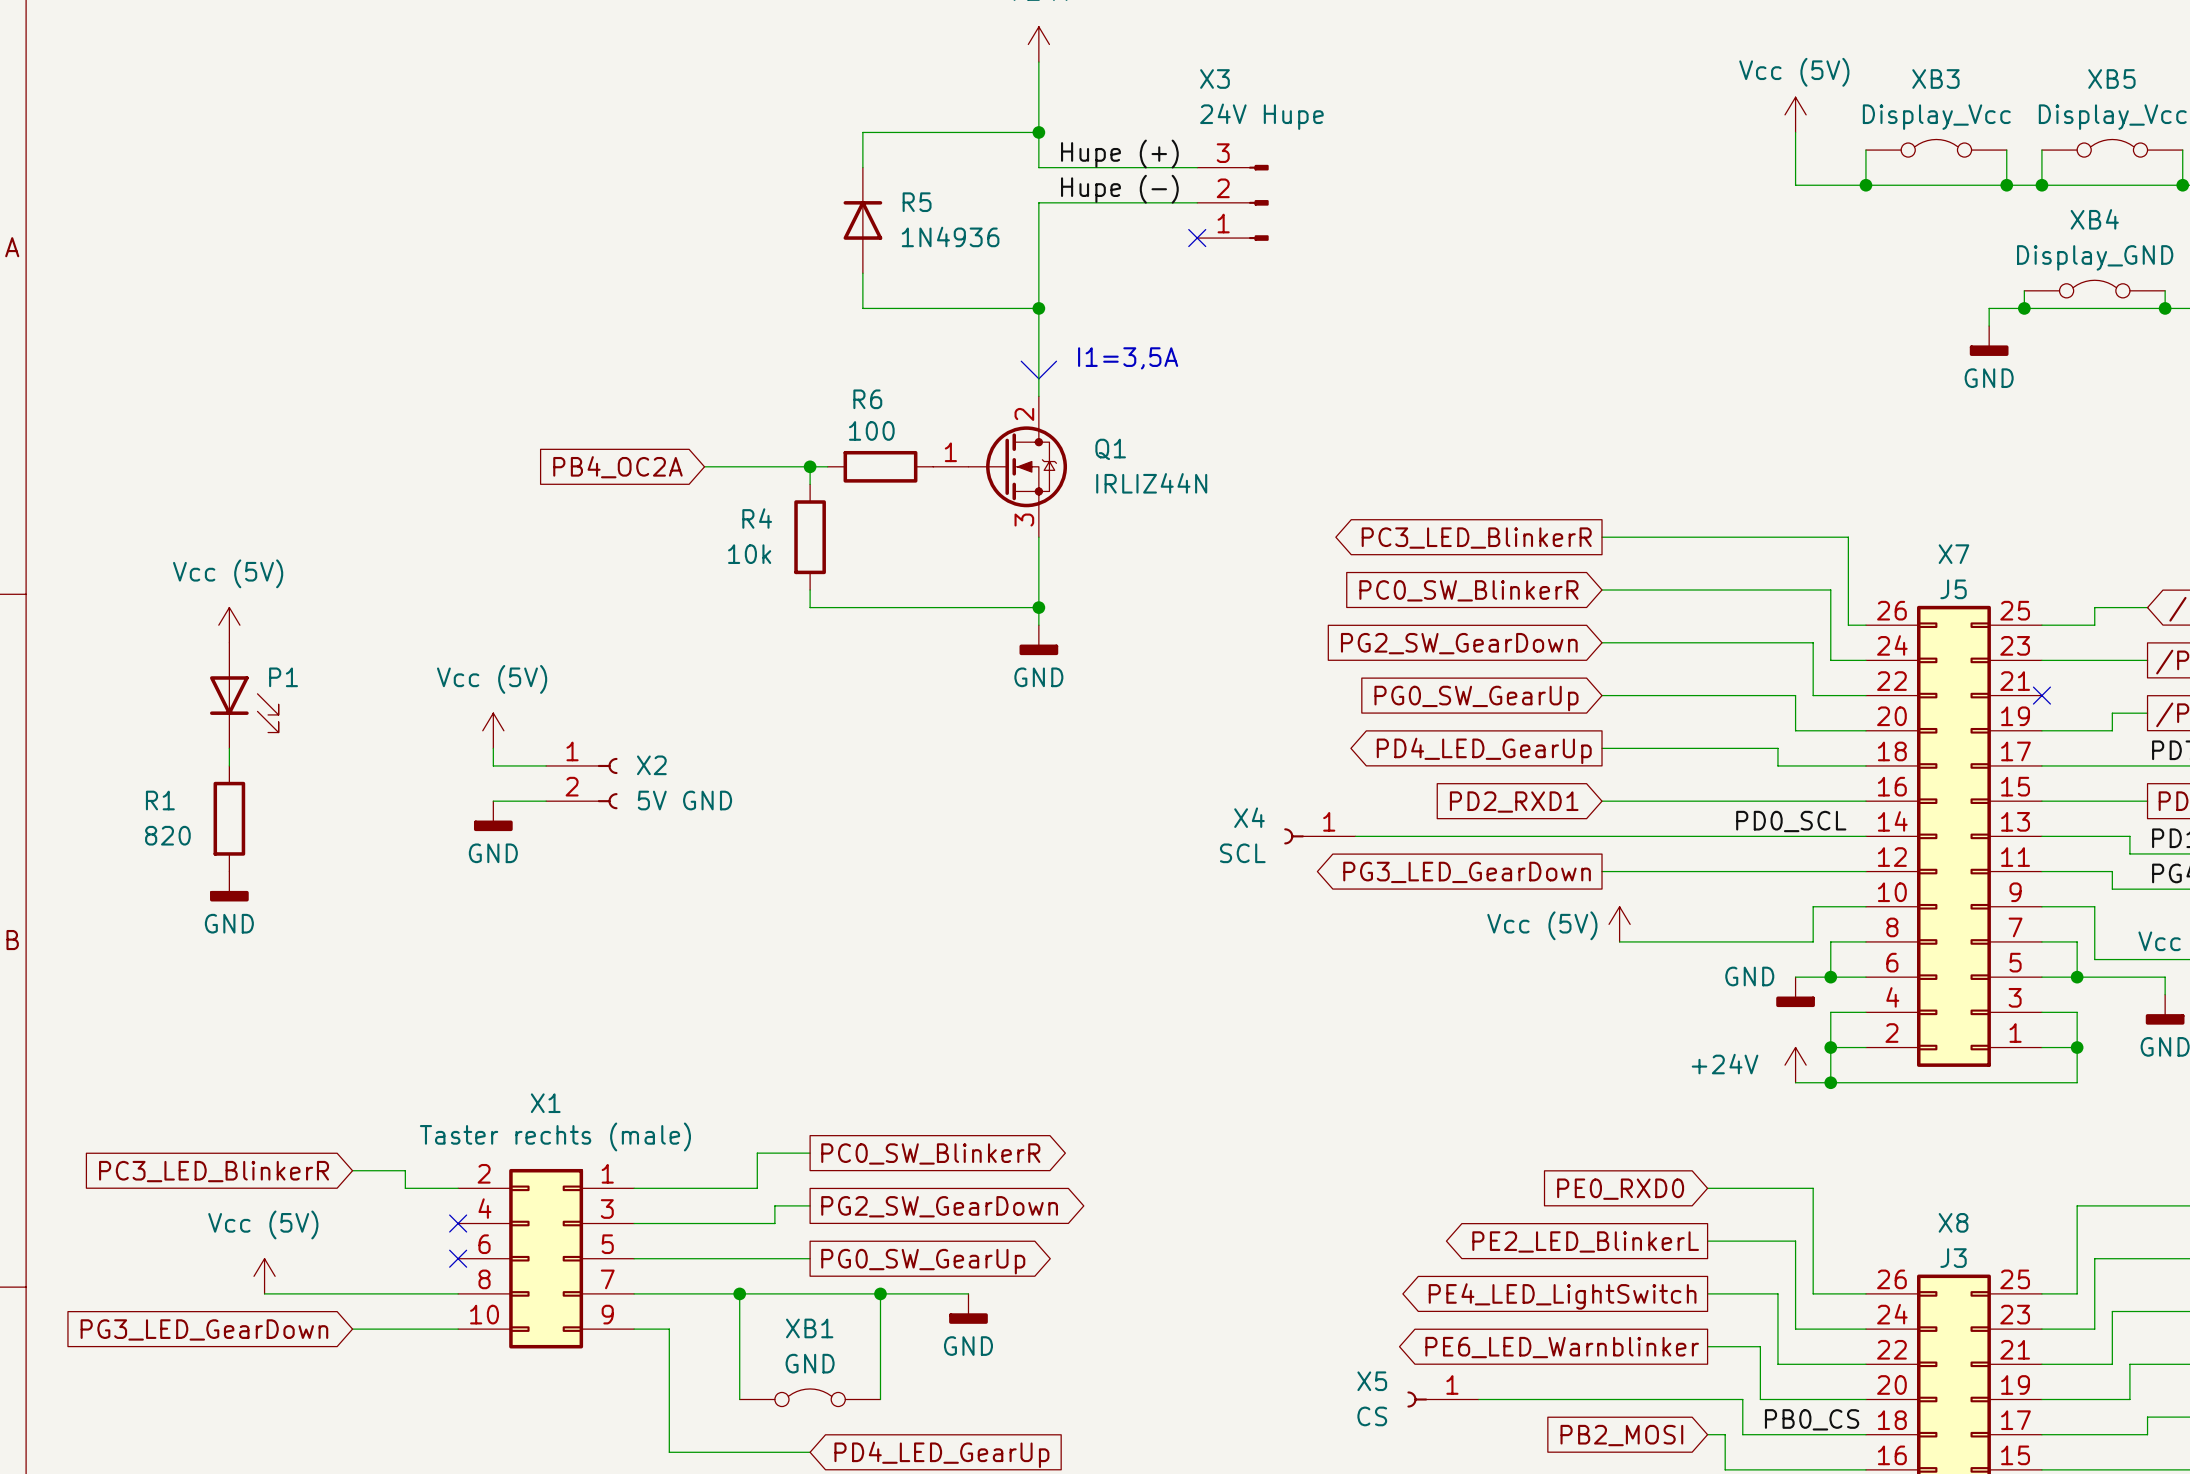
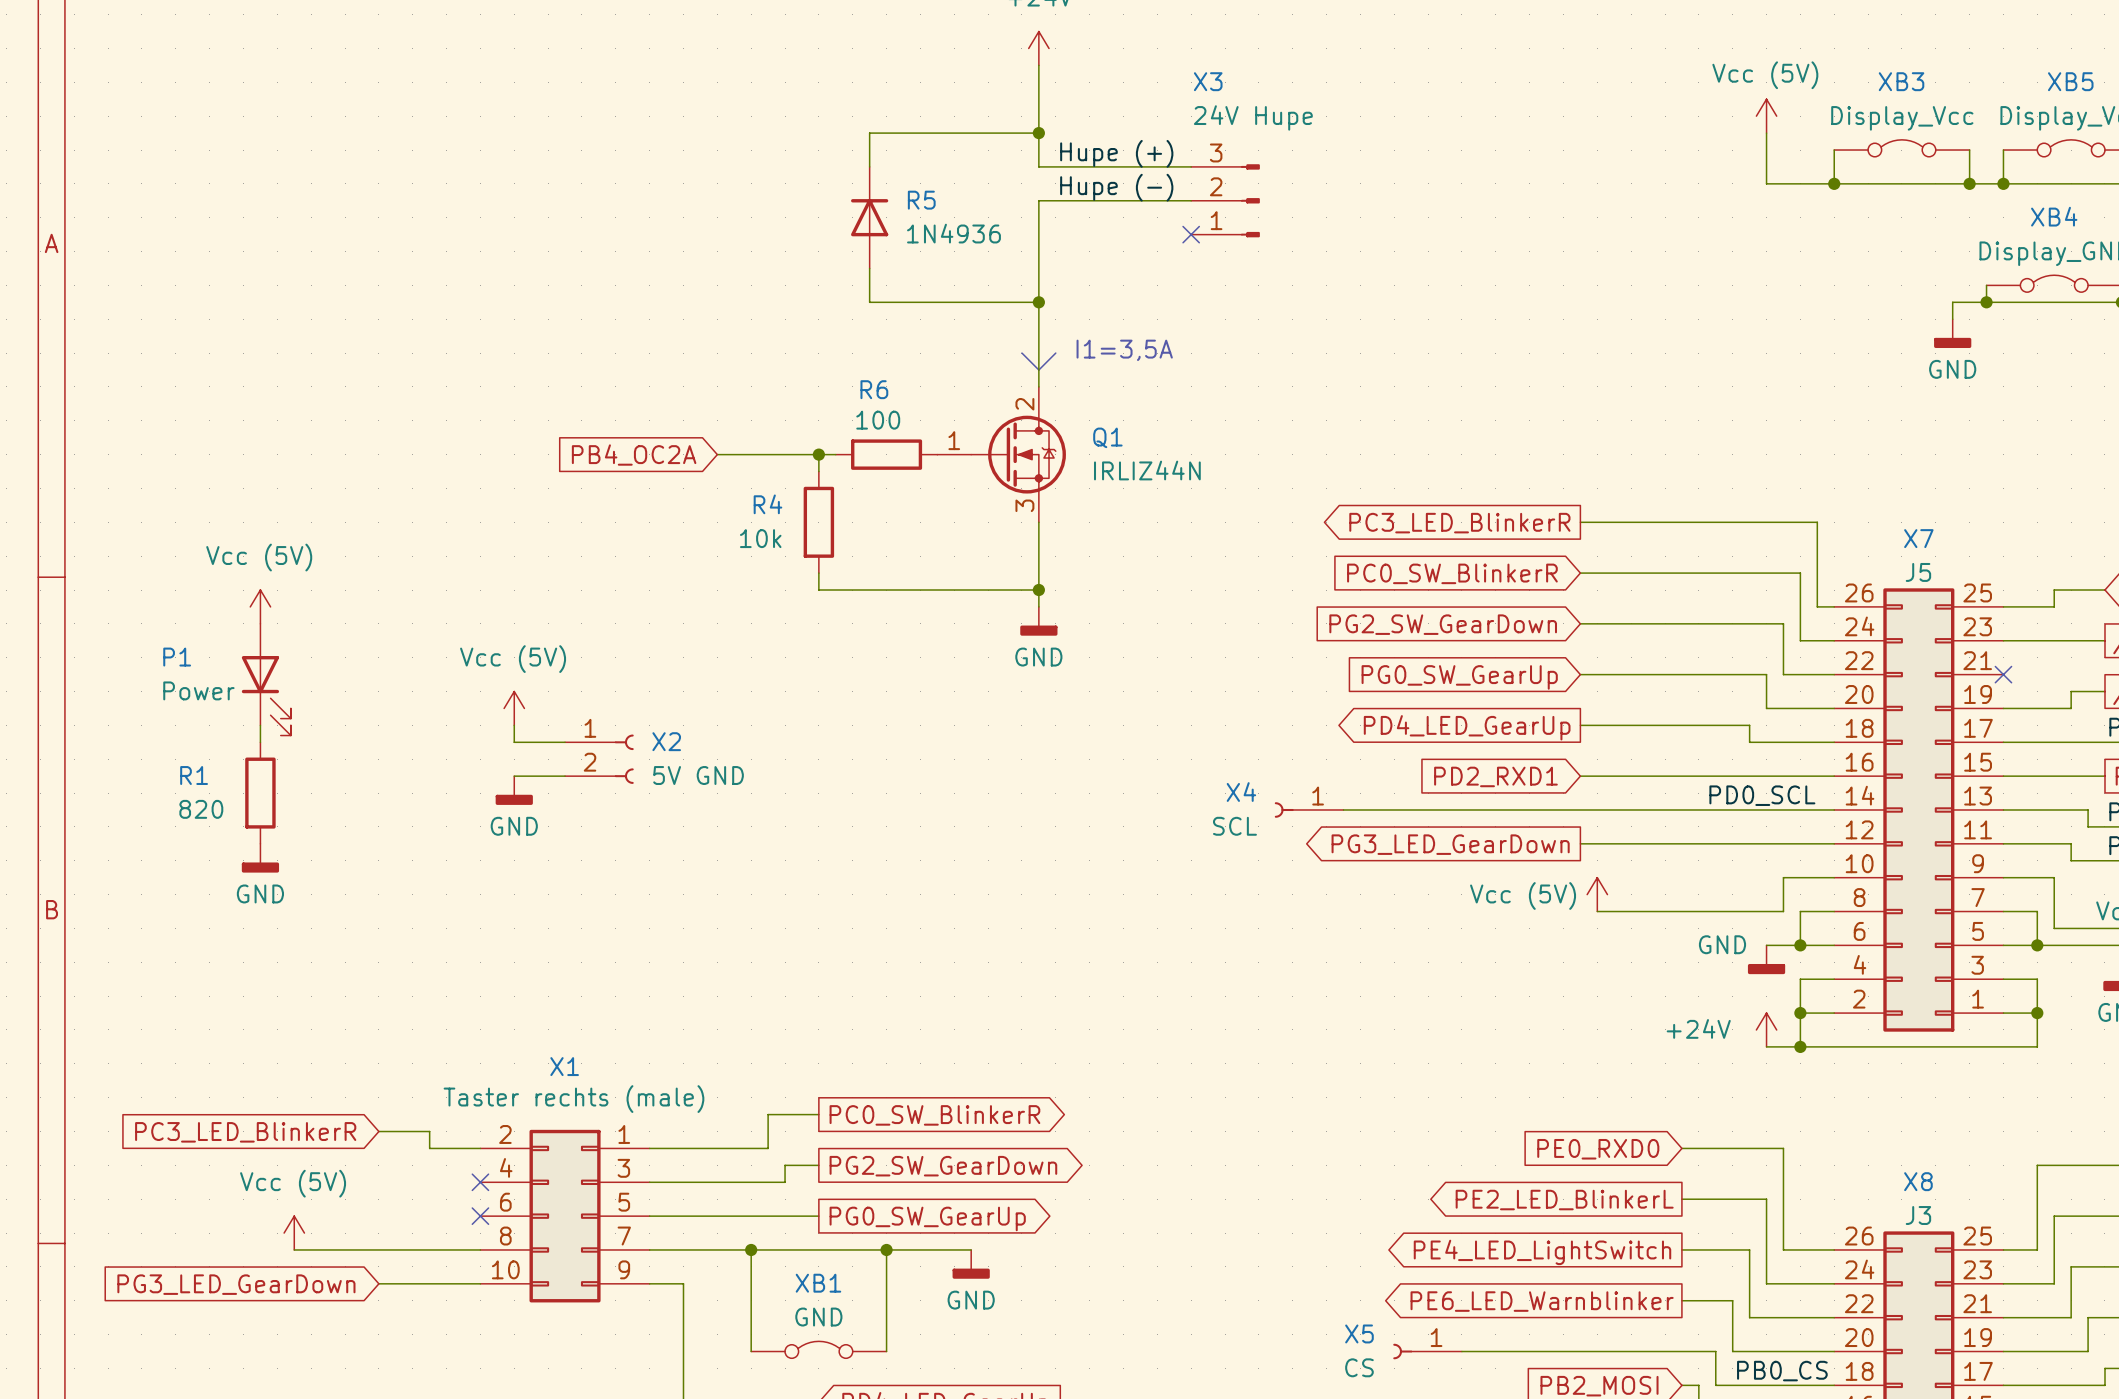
P1 symbol: [210, 642, 279, 749] -> [241, 623, 291, 736]
P1 name position: P1 (283, 677) -> P1 (177, 657)
P1 value: none -> Power (198, 690)

